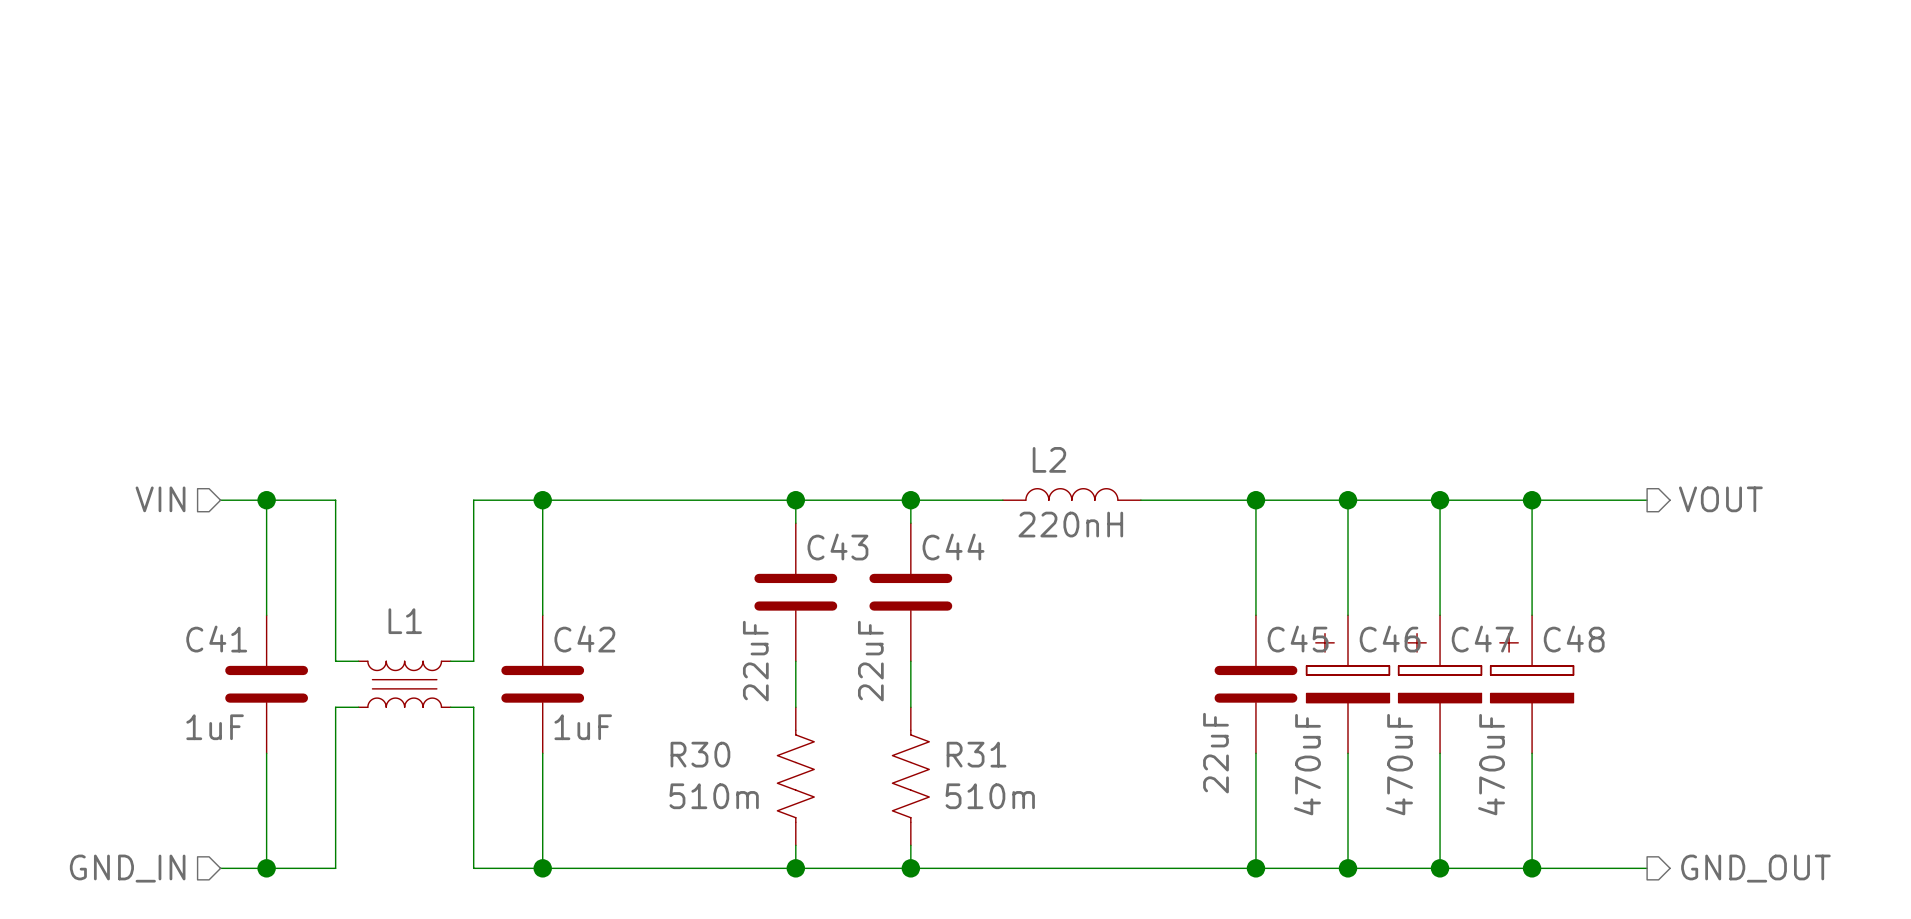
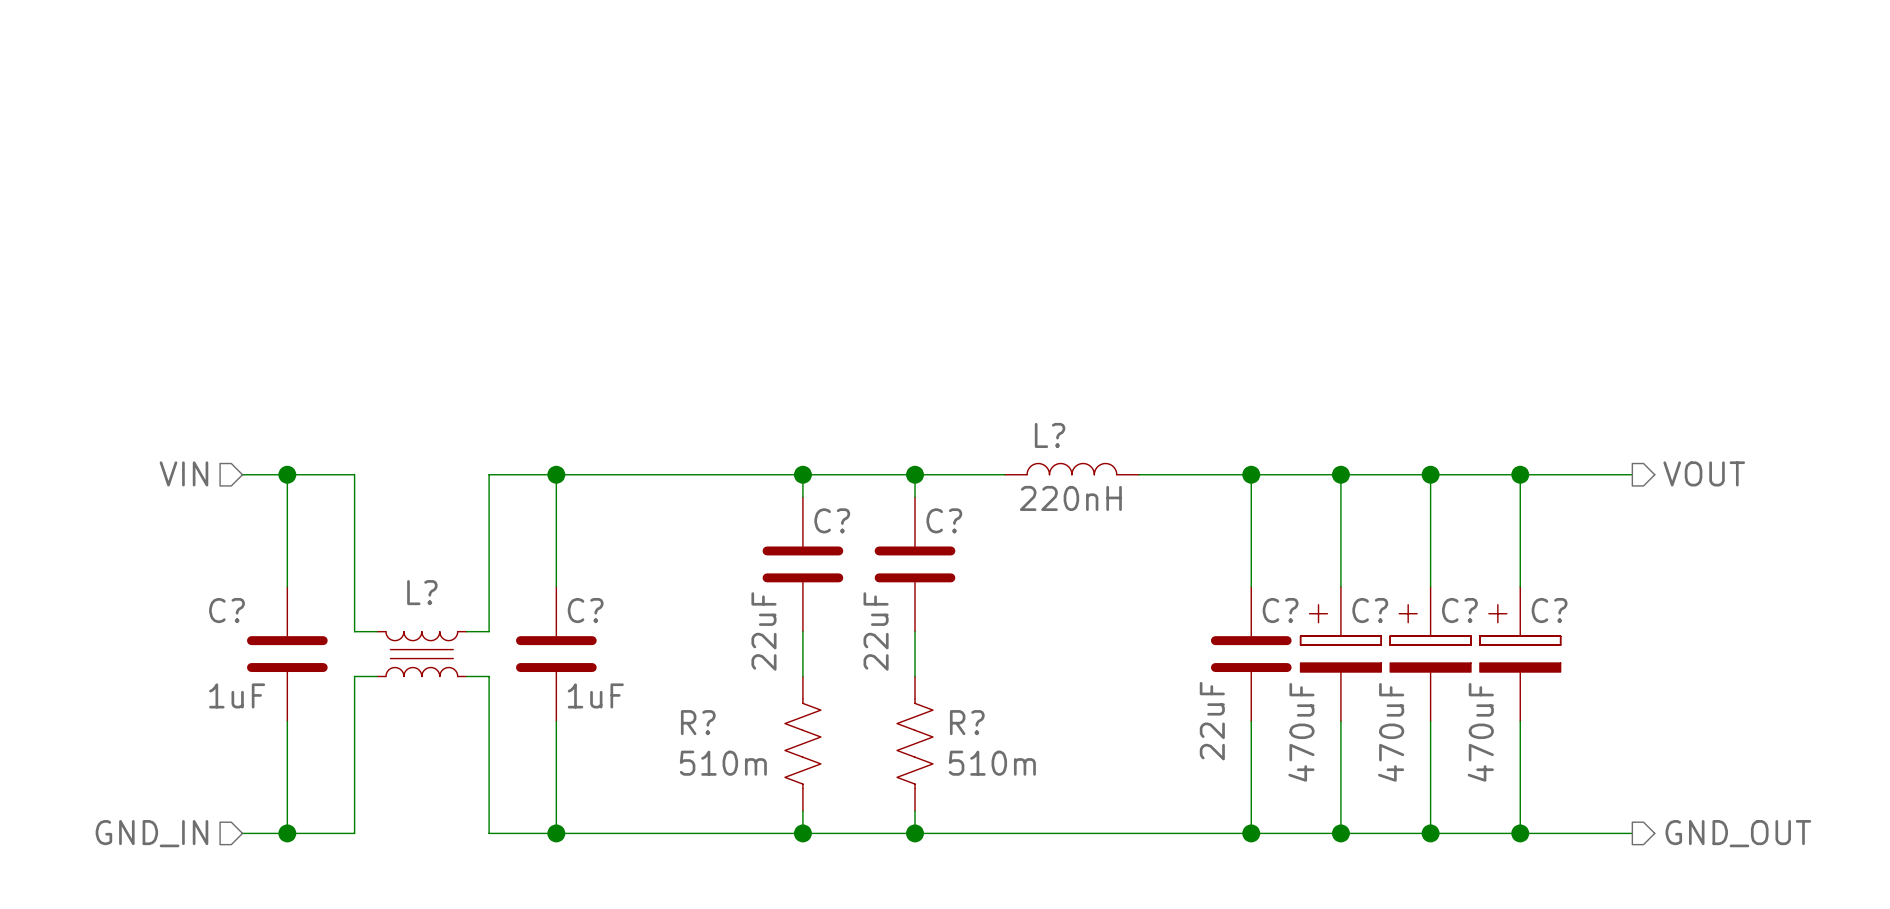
L2 name: L2 (1049, 459) -> L? (1050, 435)
C43 name: C43 (837, 547) -> C? (832, 520)
C44 name: C44 (953, 547) -> C? (944, 520)
L1 name: L1 (405, 621) -> L? (422, 592)
C41 name: C41 (216, 639) -> C? (226, 610)
C42 name: C42 (584, 639) -> C? (585, 610)
C45 name: C45 (1298, 639) -> C? (1280, 610)
C46 name: C46 (1390, 639) -> C? (1370, 610)
C47 name: C47 (1482, 639) -> C? (1459, 610)
C48 name: C48 (1574, 639) -> C? (1549, 610)
R30 name: R30 (700, 754) -> R? (698, 722)
R31 name: R31 (976, 754) -> R? (967, 722)

